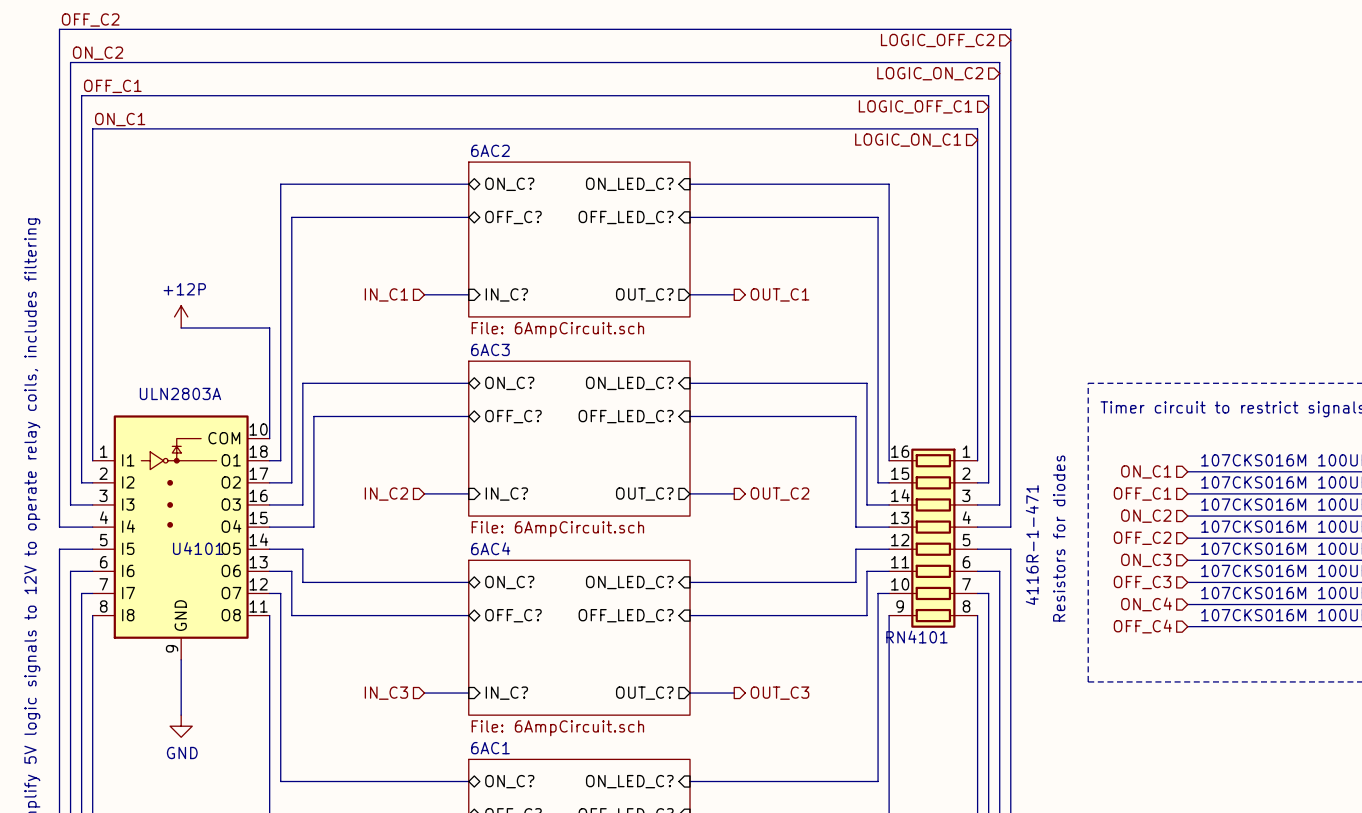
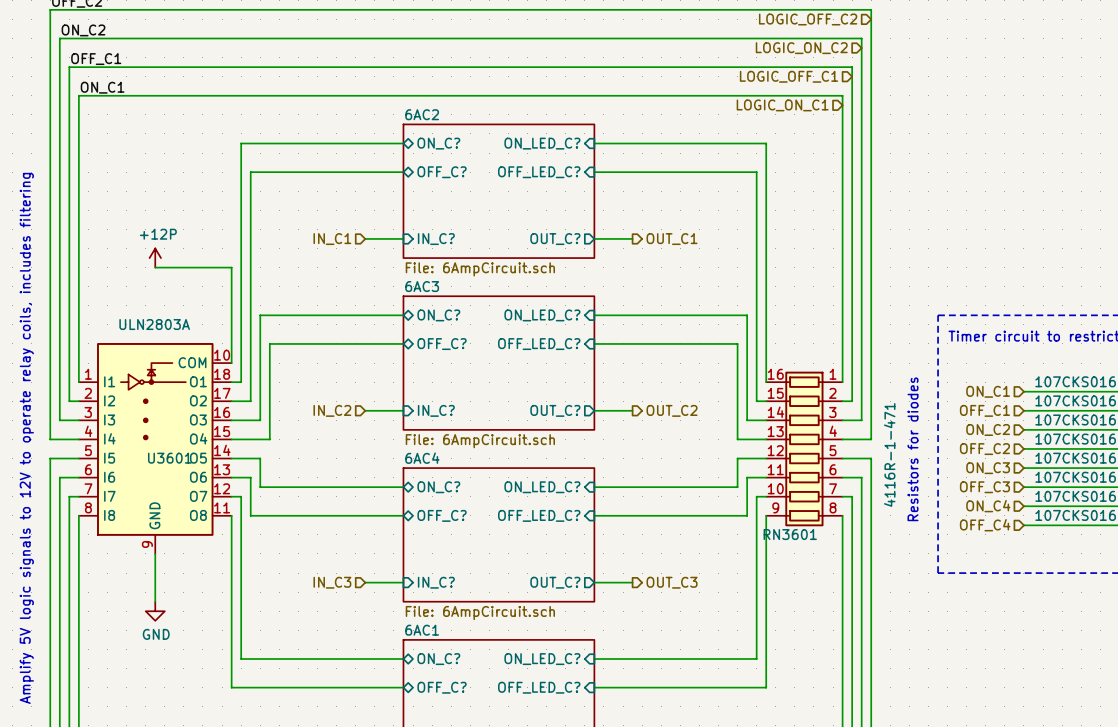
U4101 name: U4101 (198, 548) -> U3601 (169, 458)
RN4101 name: RN4101 (916, 637) -> RN3601 (790, 534)

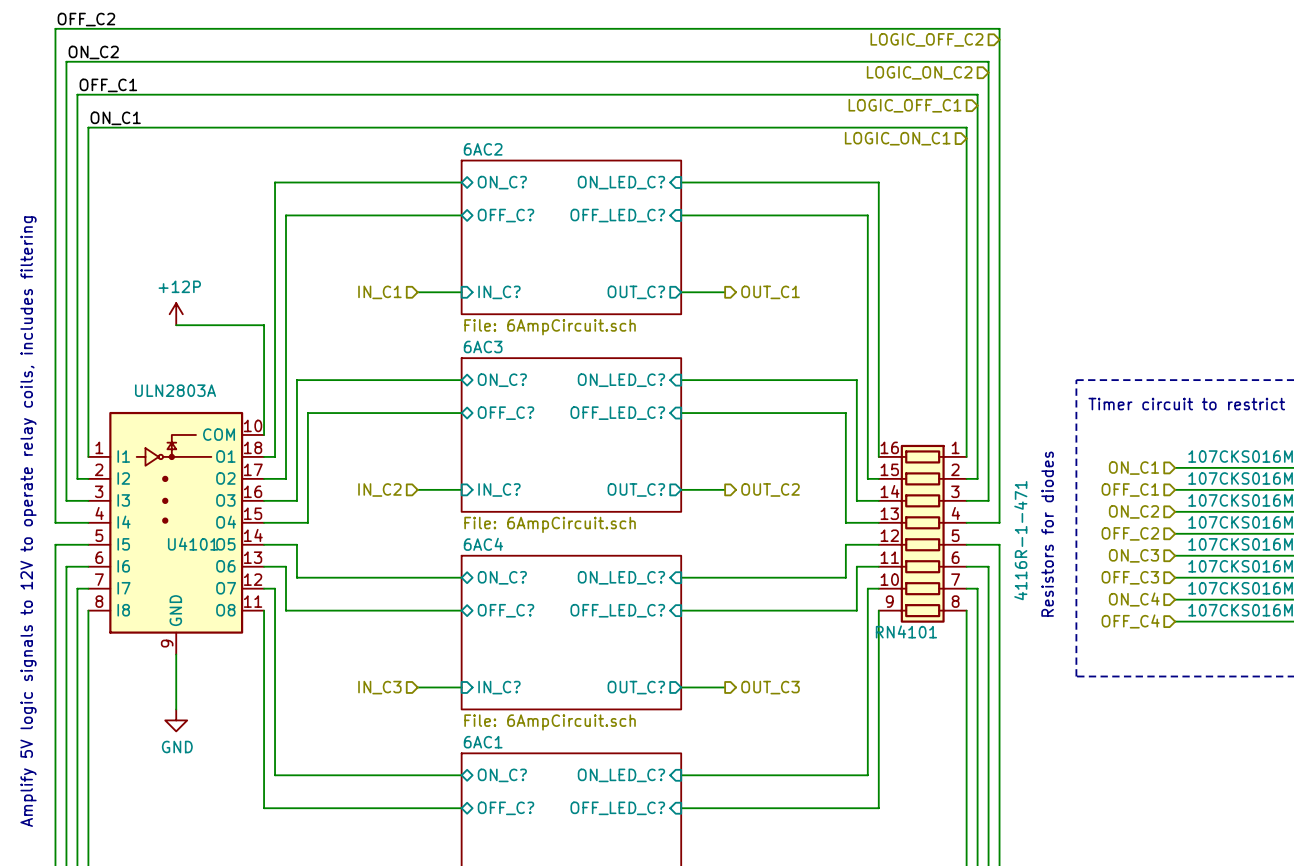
U3601 name: U3601 (169, 458) -> U4101 (193, 544)
RN3601 name: RN3601 (790, 534) -> RN4101 (906, 631)

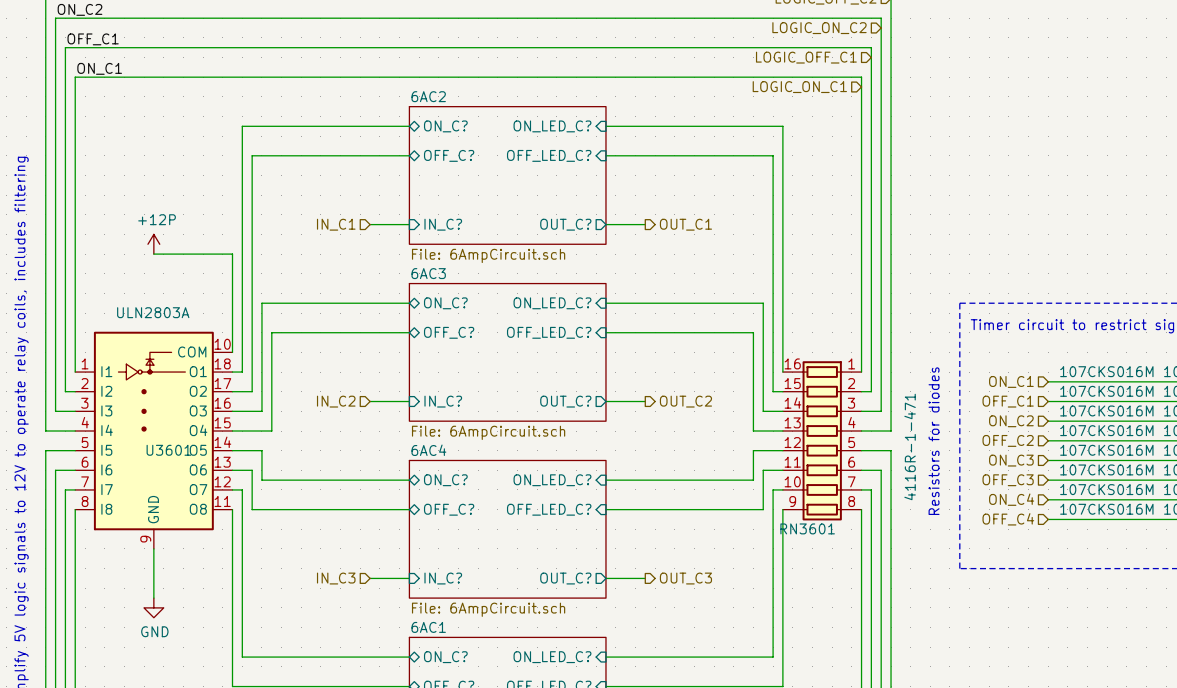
U4101 name: U4101 (193, 544) -> U3601 (168, 450)
RN4101 name: RN4101 (906, 631) -> RN3601 (807, 528)

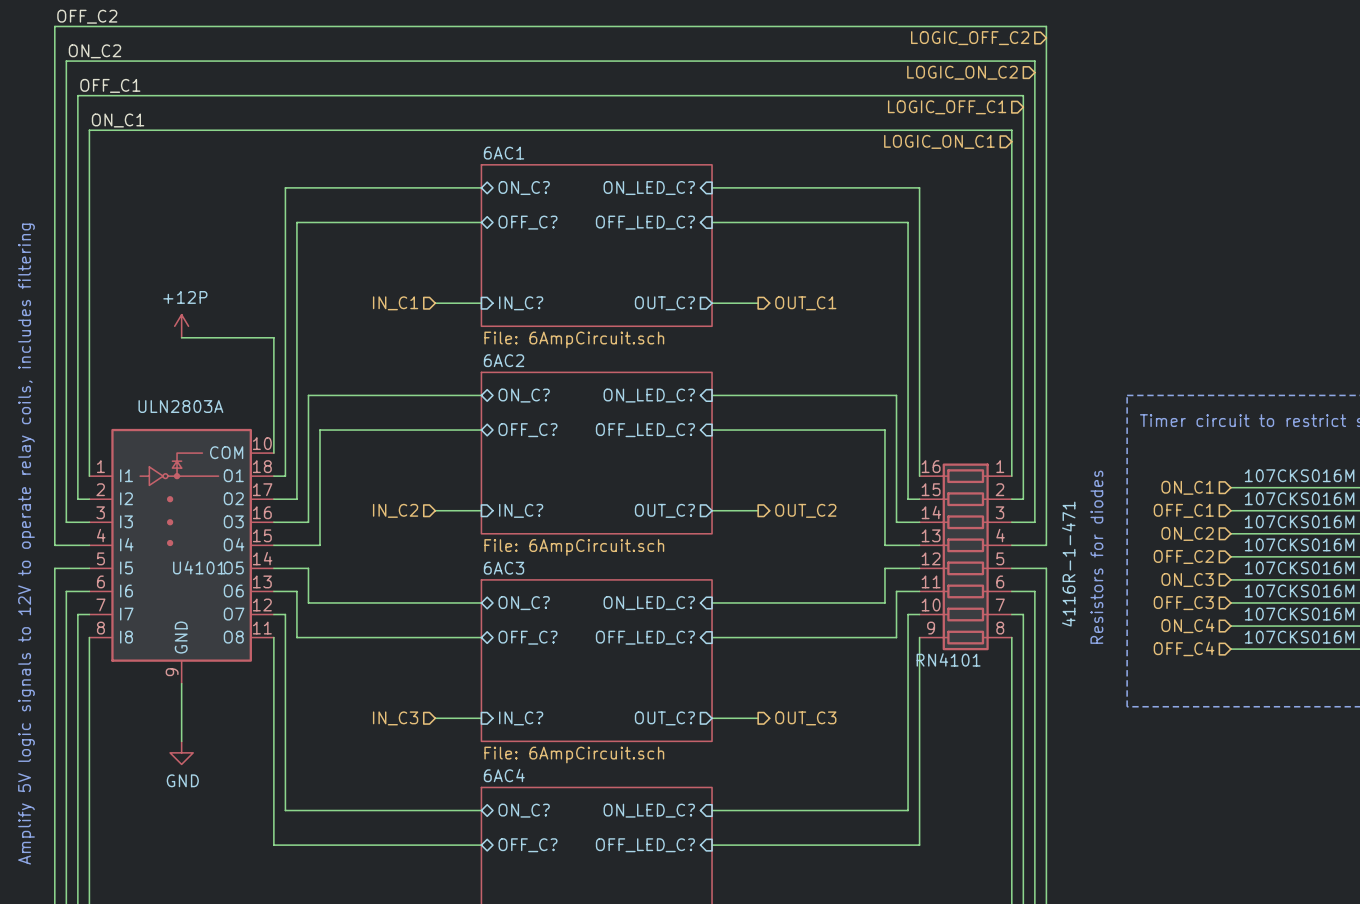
sheet 6AC2 name: 6AC2 (428, 96) -> 6AC1 (504, 153)
sheet 6AC3 name: 6AC3 (428, 273) -> 6AC2 (504, 360)
U3601 name: U3601 (168, 450) -> U4101 (199, 567)
sheet 6AC4 name: 6AC4 (428, 450) -> 6AC3 (504, 568)
RN3601 name: RN3601 (807, 528) -> RN4101 (948, 659)
sheet 6AC1 name: 6AC1 (428, 627) -> 6AC4 (504, 775)

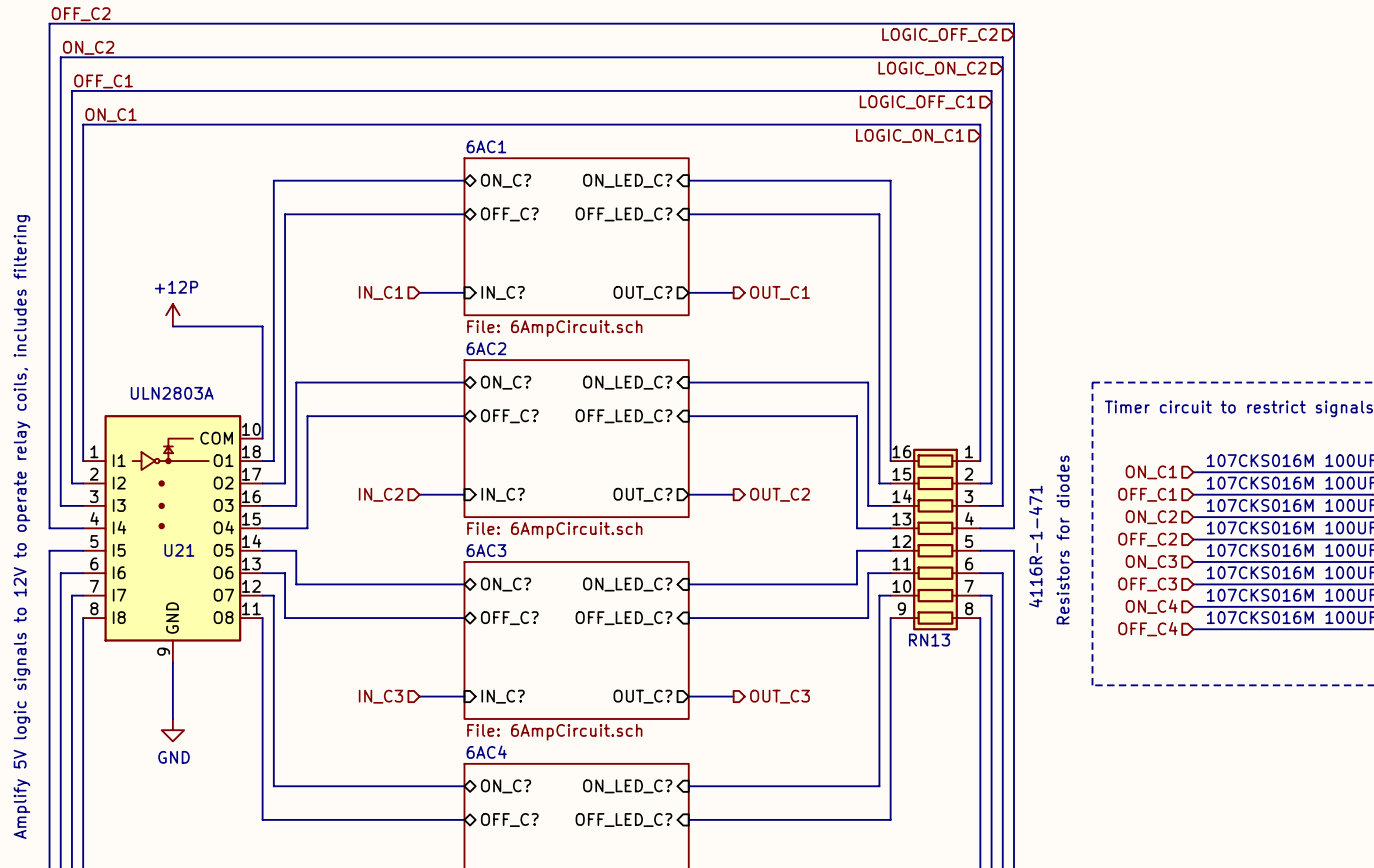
U4101 name: U4101 (199, 567) -> U21 (179, 550)
RN4101 name: RN4101 (948, 659) -> RN13 (929, 640)

